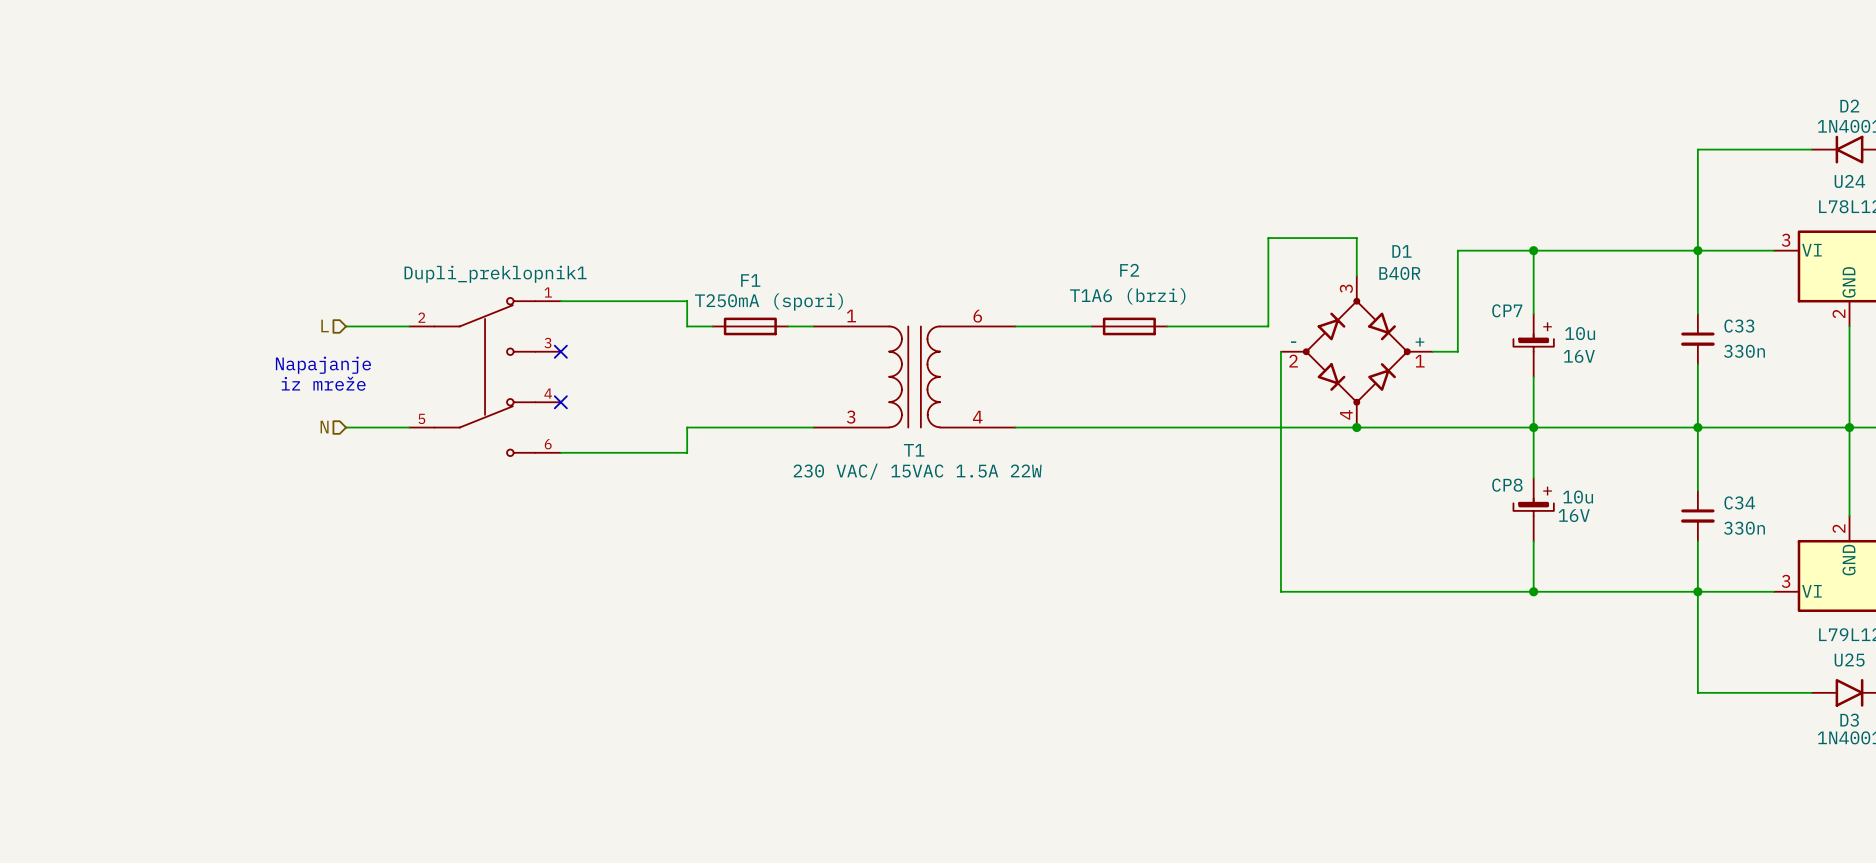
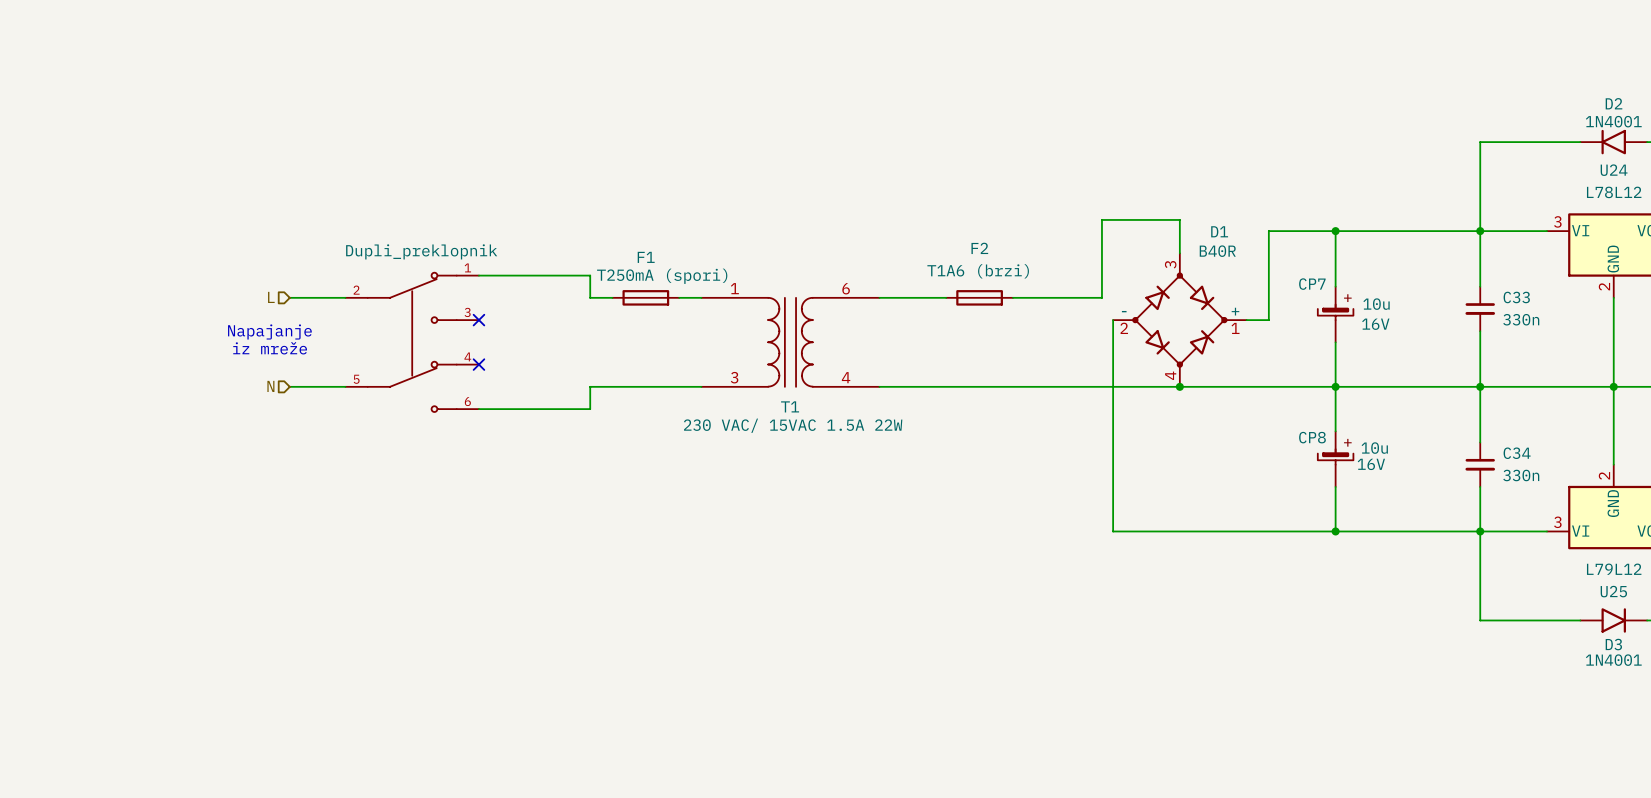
Dupli_preklopnik1 name: Dupli_preklopnik1 (495, 274) -> Dupli_preklopnik (421, 251)

